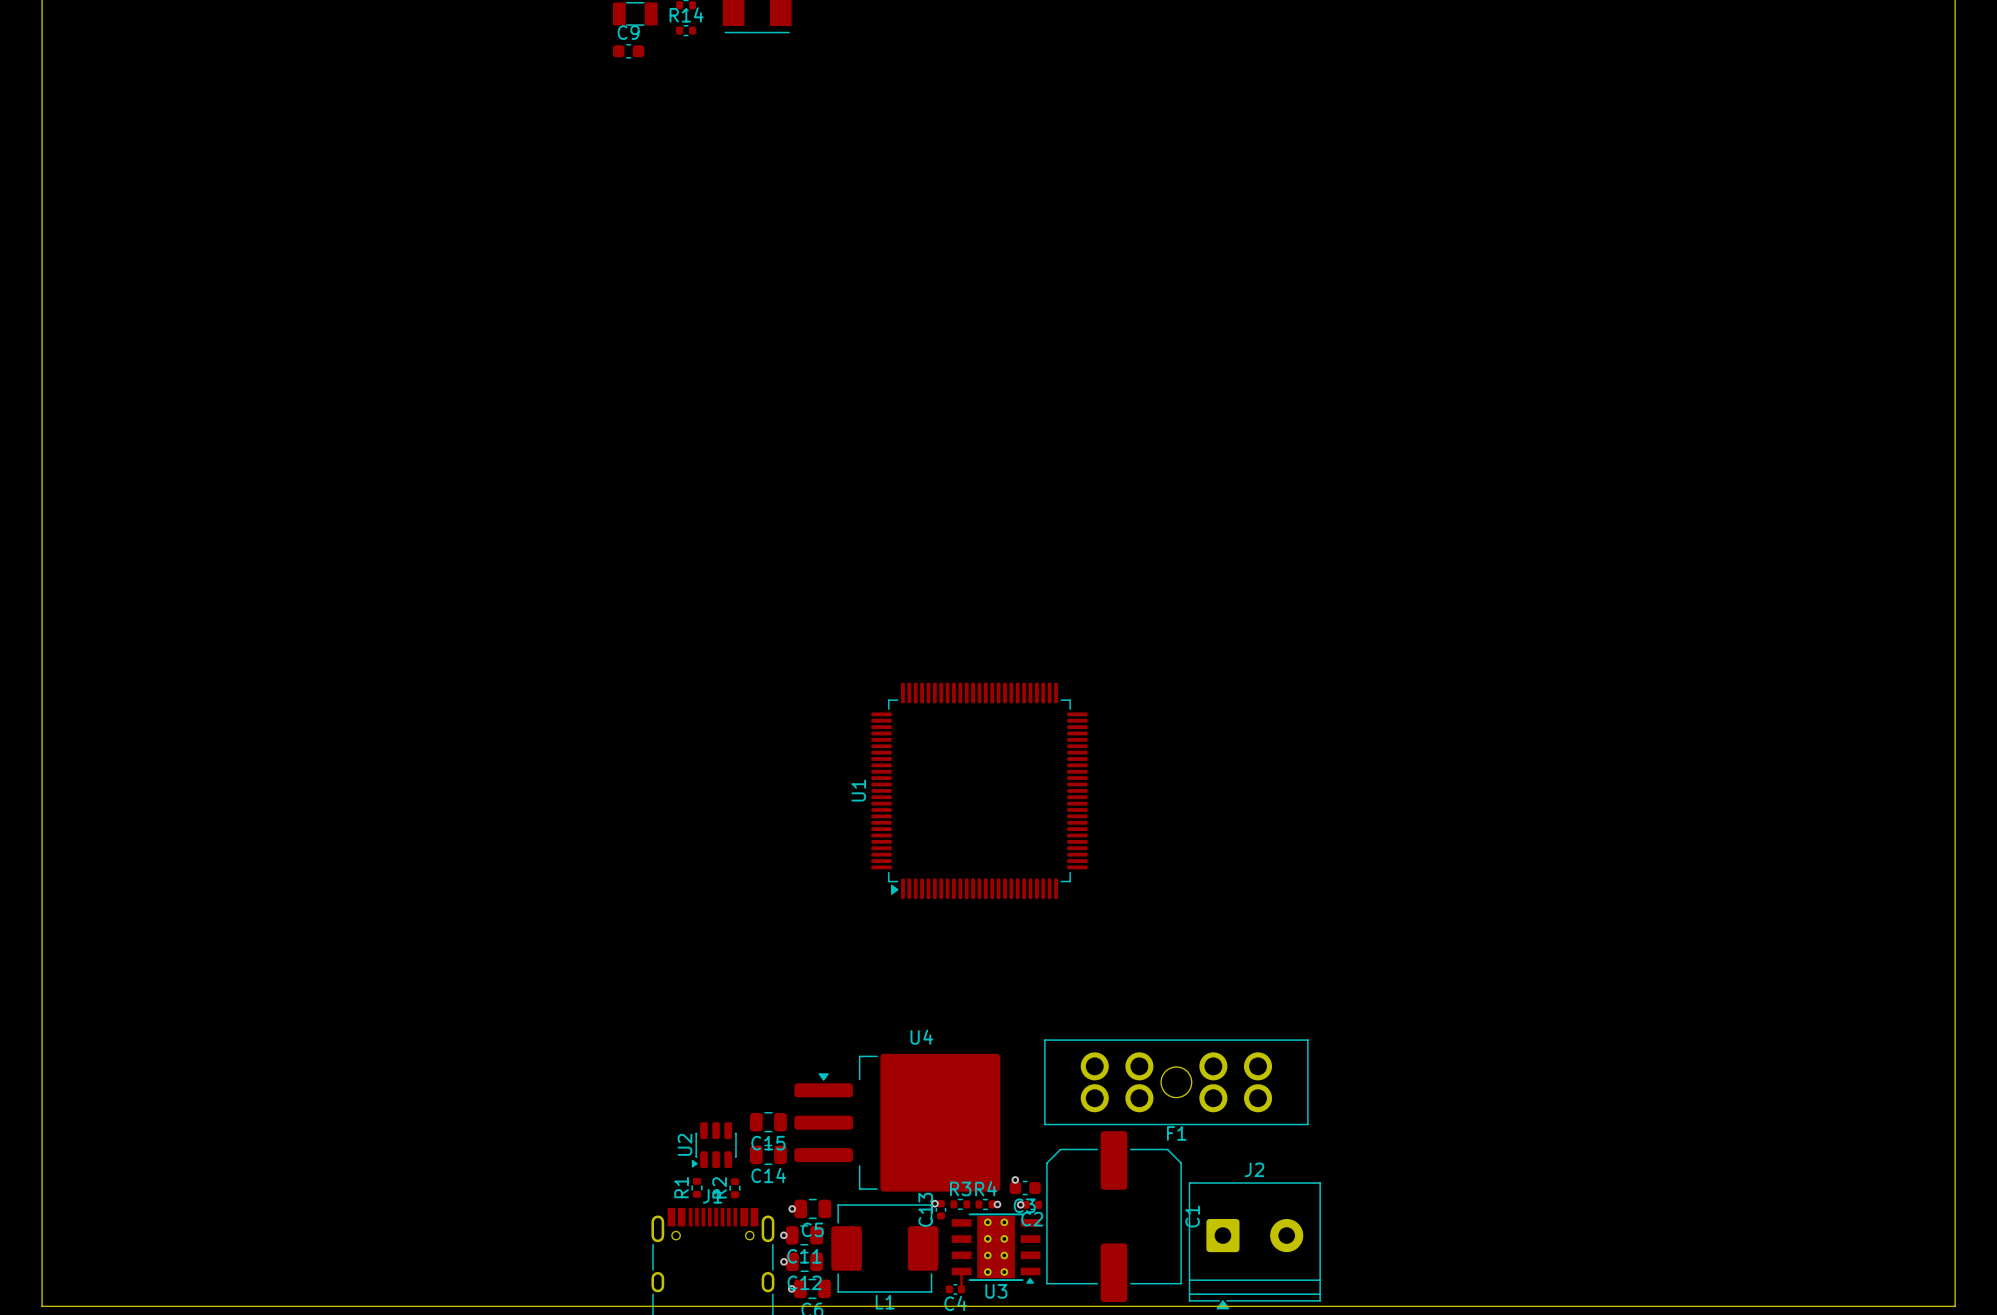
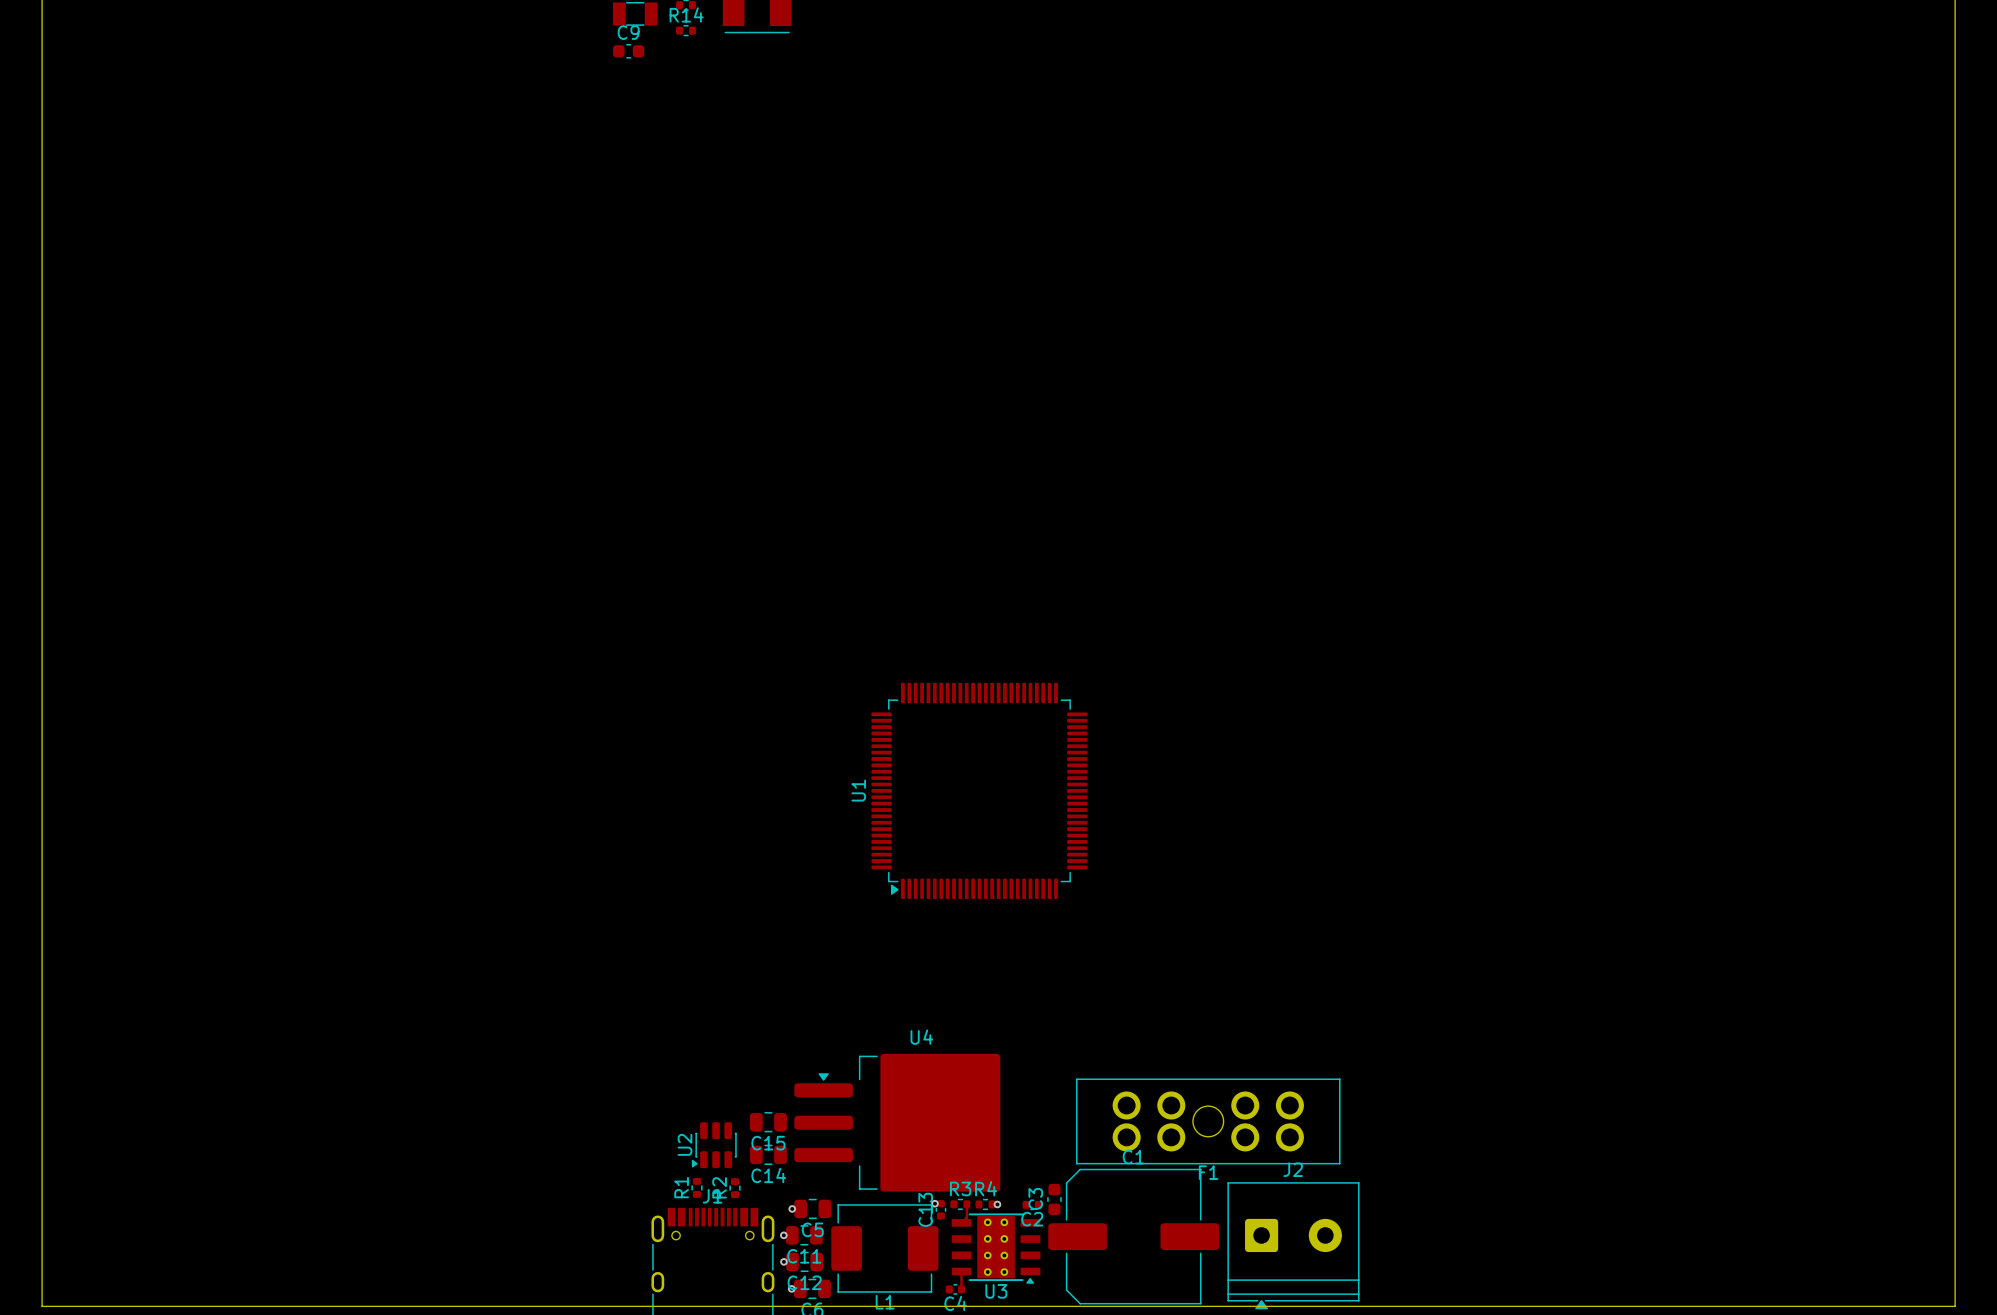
F1 position: (1176, 1082) -> (1208, 1121)
via: (1015, 1179) -> none
C3 rotation: 0° (1025, 1188) -> 90° clockwise (1054, 1199)
C3 position: (1025, 1188) -> (1054, 1199)
track: none -> (966, 1204) (966, 1217) (961, 1222)
via: (1020, 1204) -> none
C1 rotation: 0° (1114, 1216) -> 90° counterclockwise (1133, 1236)
J2 position: (1254, 1245) -> (1293, 1245)

